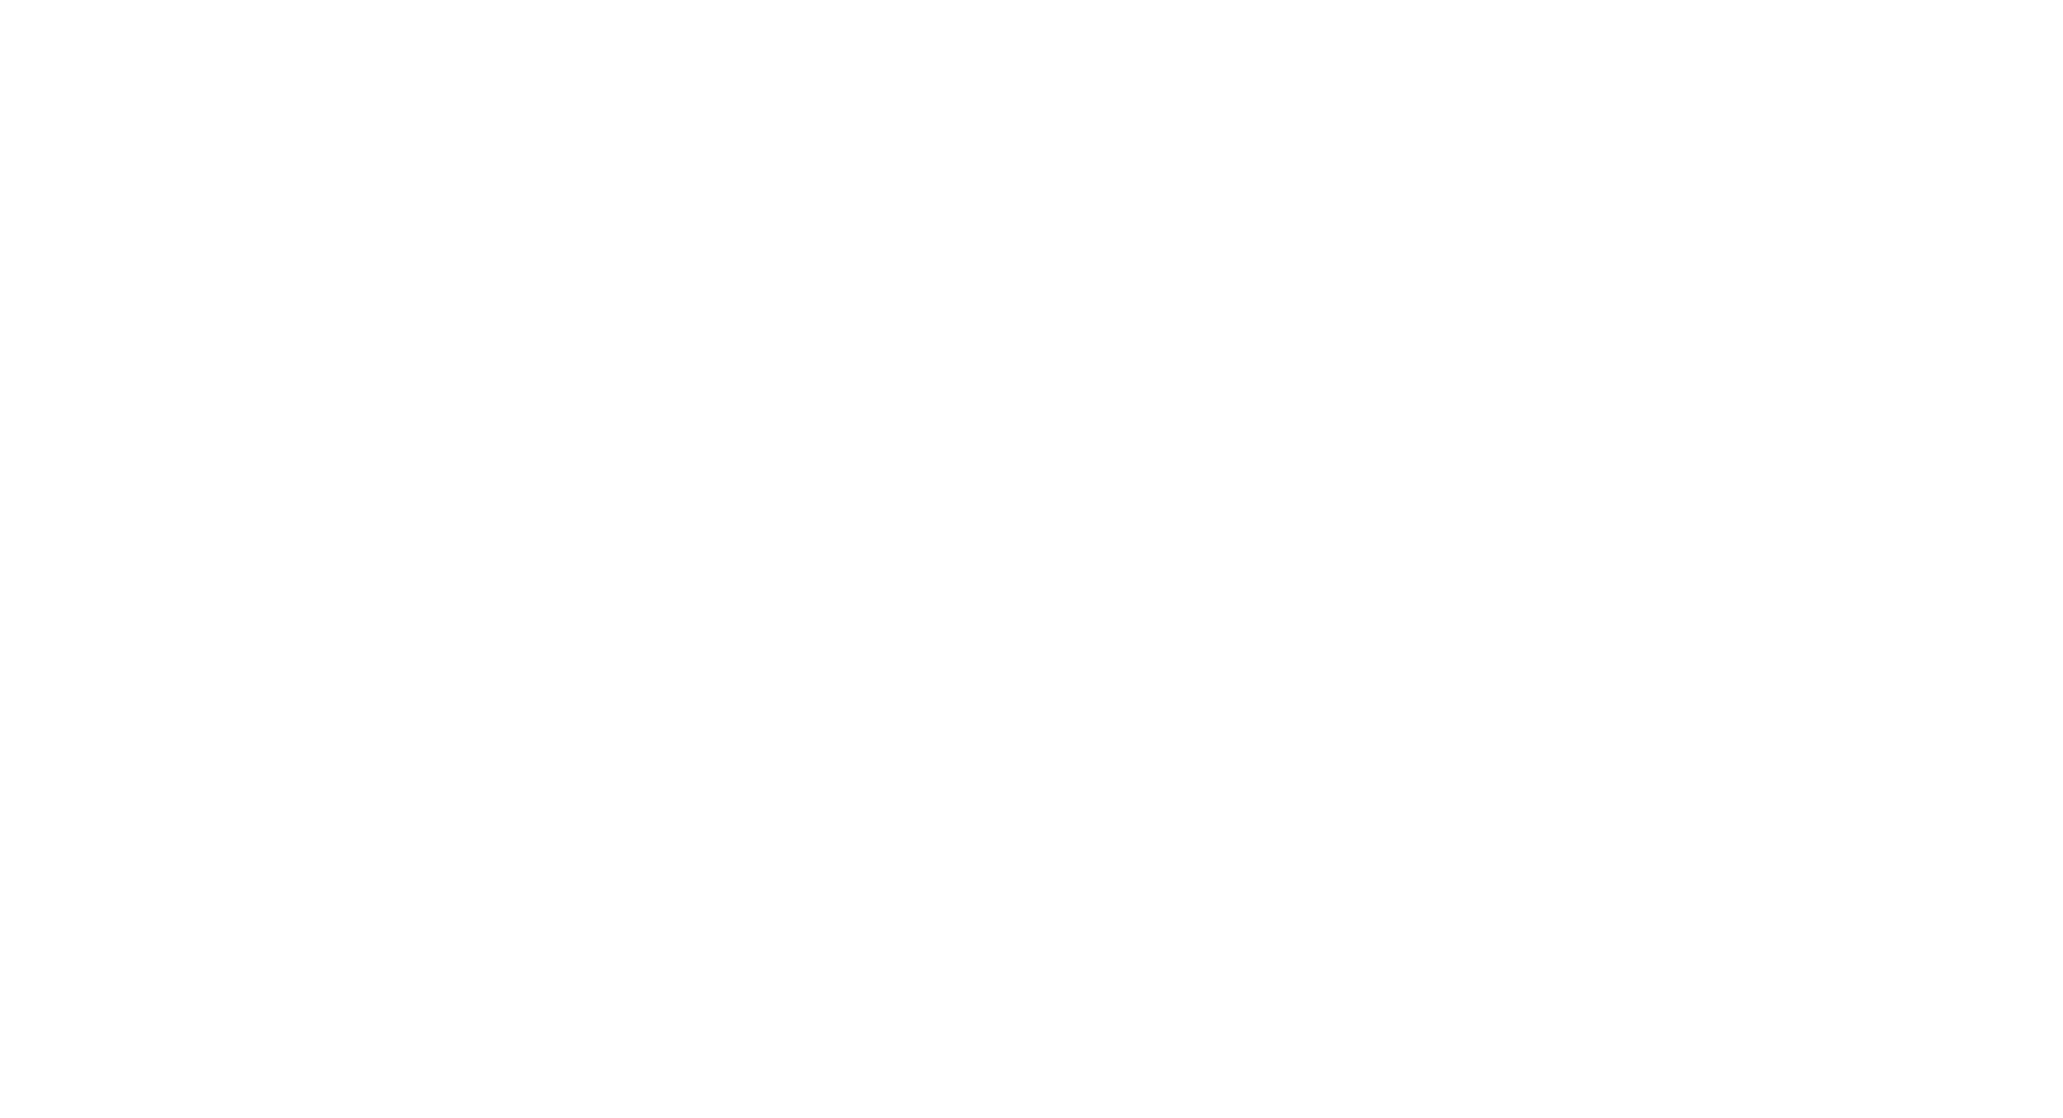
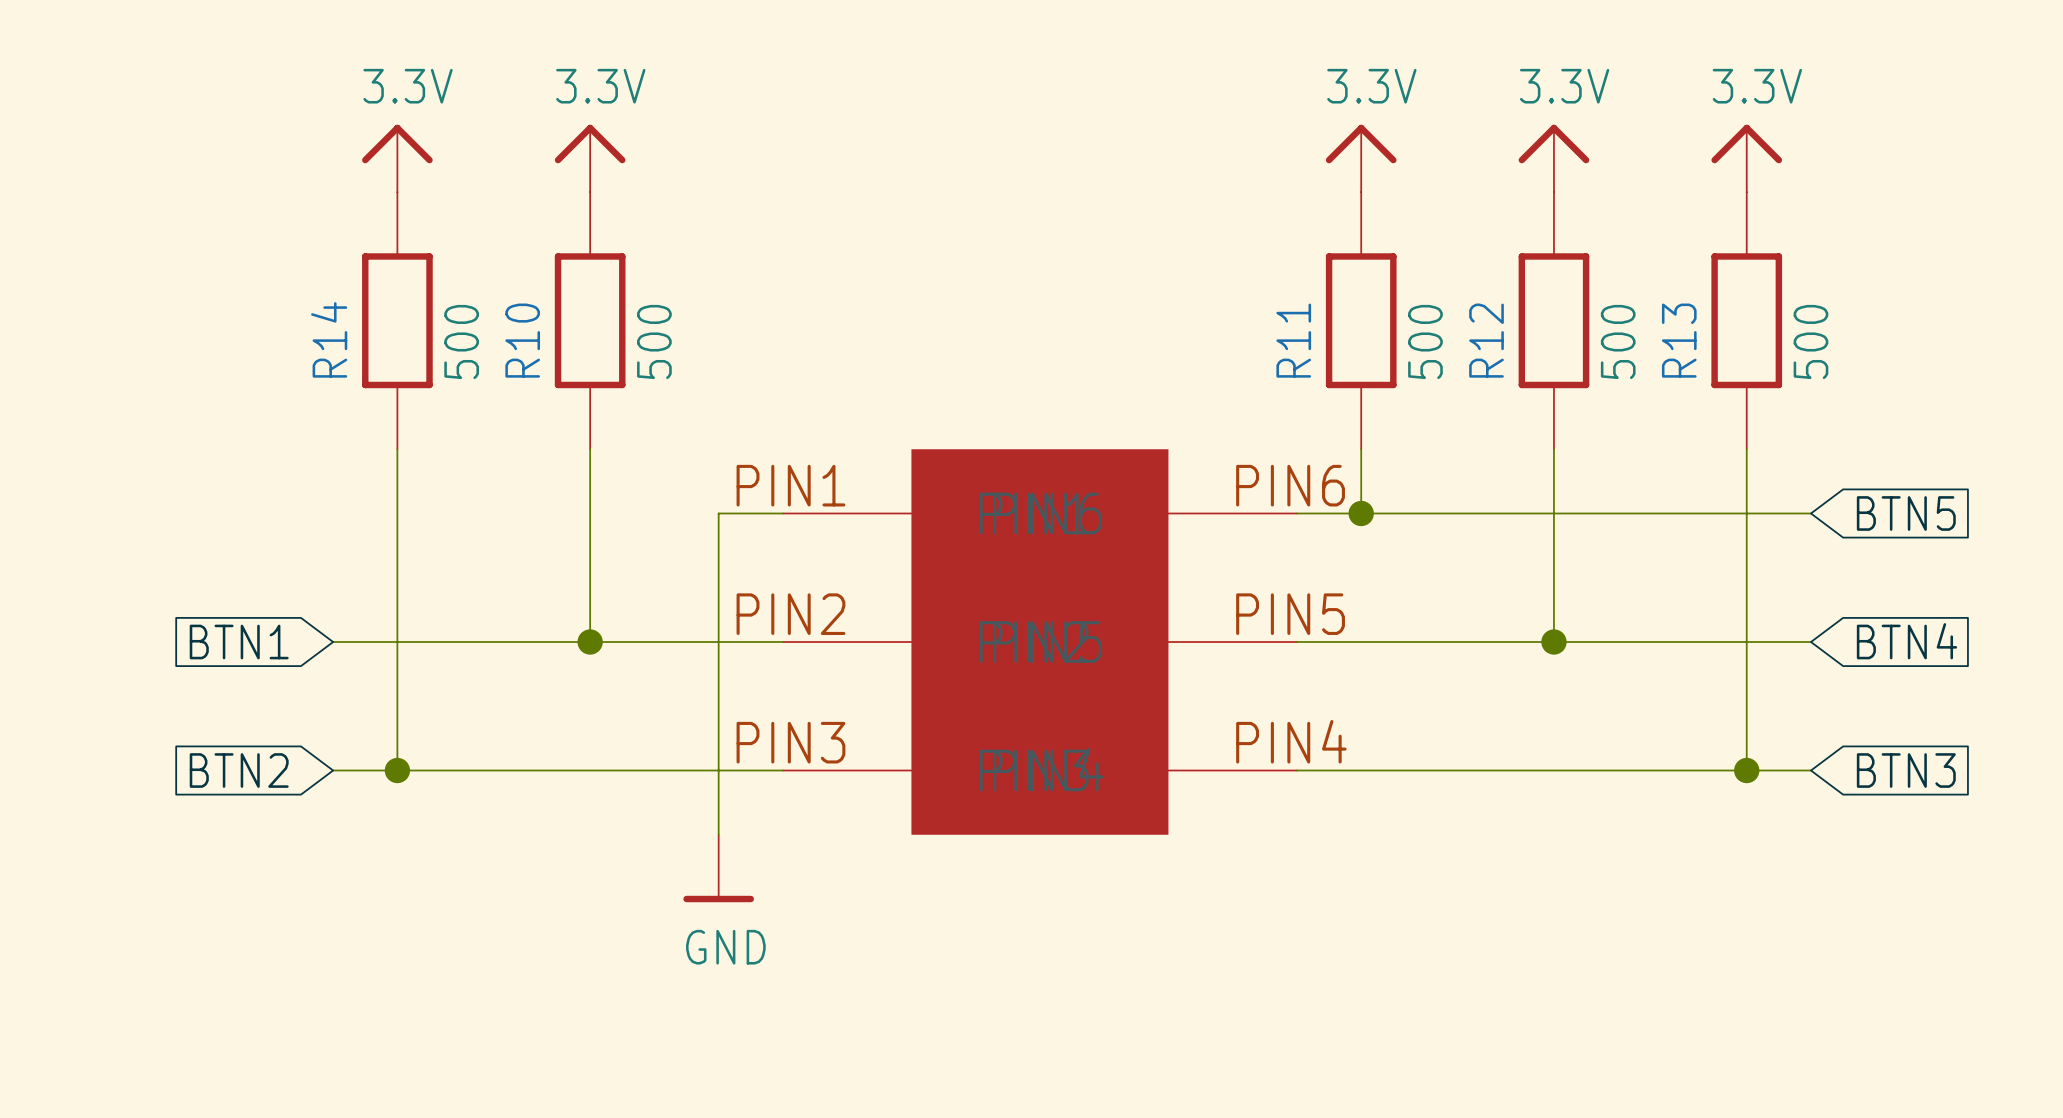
power symbol: none -> 3.3V (397, 158)
power symbol: none -> 3.3V (590, 158)
power symbol: none -> 3.3V (1361, 158)
power symbol: none -> 3.3V (1553, 158)
power symbol: none -> 3.3V (1746, 158)
R14: none -> 500 (397, 320)
R10: none -> 500 (590, 320)
R11: none -> 500 (1361, 320)
R12: none -> 500 (1553, 320)
R13: none -> 500 (1746, 320)
wire: none -> (397, 449) (397, 770)
wire: none -> (590, 449) (590, 642)
wire: none -> (1361, 449) (1361, 513)
wire: none -> (1553, 449) (1553, 642)
wire: none -> (1746, 449) (1746, 770)
wire: none -> (782, 513) (718, 513) (718, 834)
wire: none -> (1296, 513) (1810, 513)
junction: none -> (1361, 513)
global label: none -> BTN5 (1906, 513)
global label: none -> BTN1 (239, 642)
wire: none -> (333, 642) (782, 642)
junction: none -> (590, 642)
part: none -> (1039, 642)
wire: none -> (1296, 642) (1810, 642)
junction: none -> (1553, 642)
global label: none -> BTN4 (1906, 641)
global label: none -> BTN2 (239, 770)
wire: none -> (333, 770) (782, 770)
junction: none -> (397, 770)
wire: none -> (1296, 770) (1810, 770)
junction: none -> (1746, 770)
global label: none -> BTN3 (1906, 770)
power symbol: none -> GND (718, 868)

